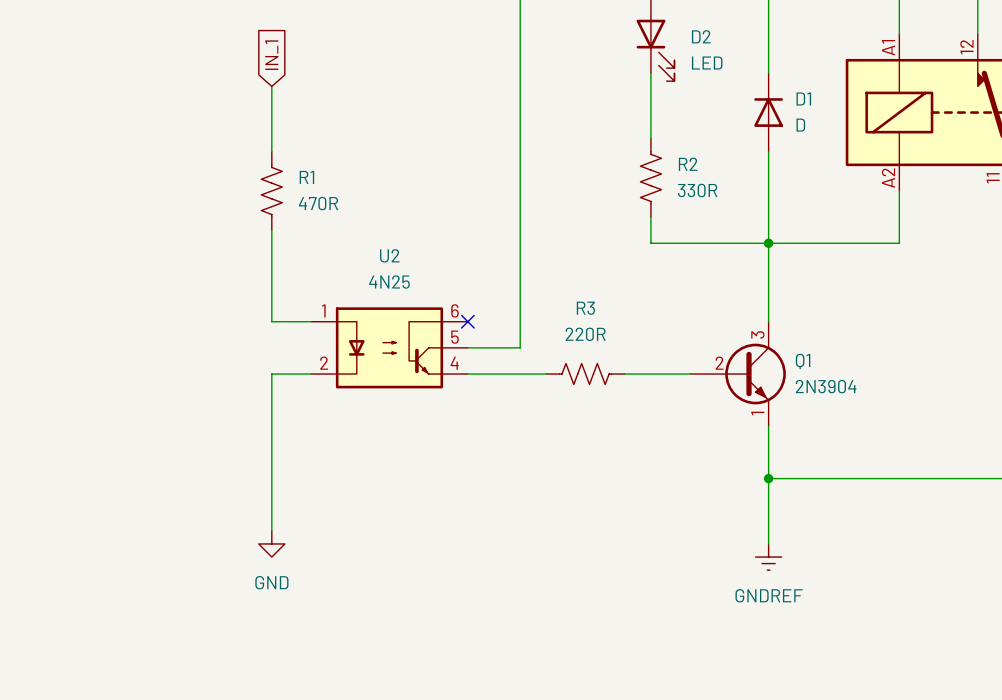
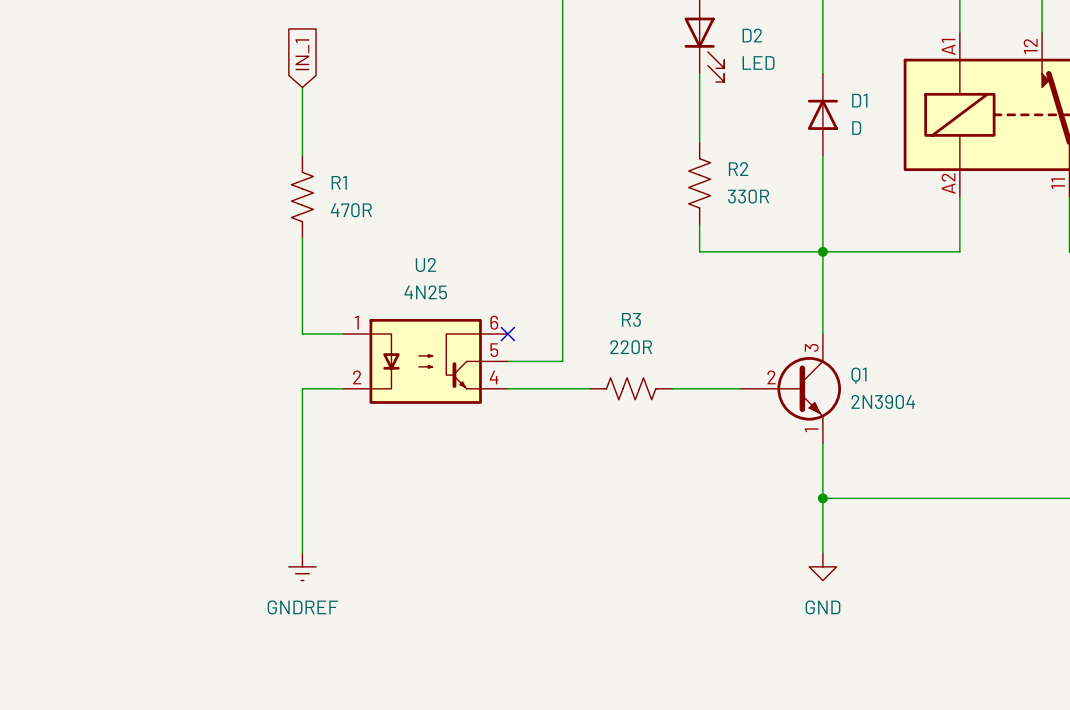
power symbol: GND (271, 543) -> GNDREF (302, 566)
power symbol: none -> GND (822, 566)
power symbol: GNDREF (768, 557) -> none

